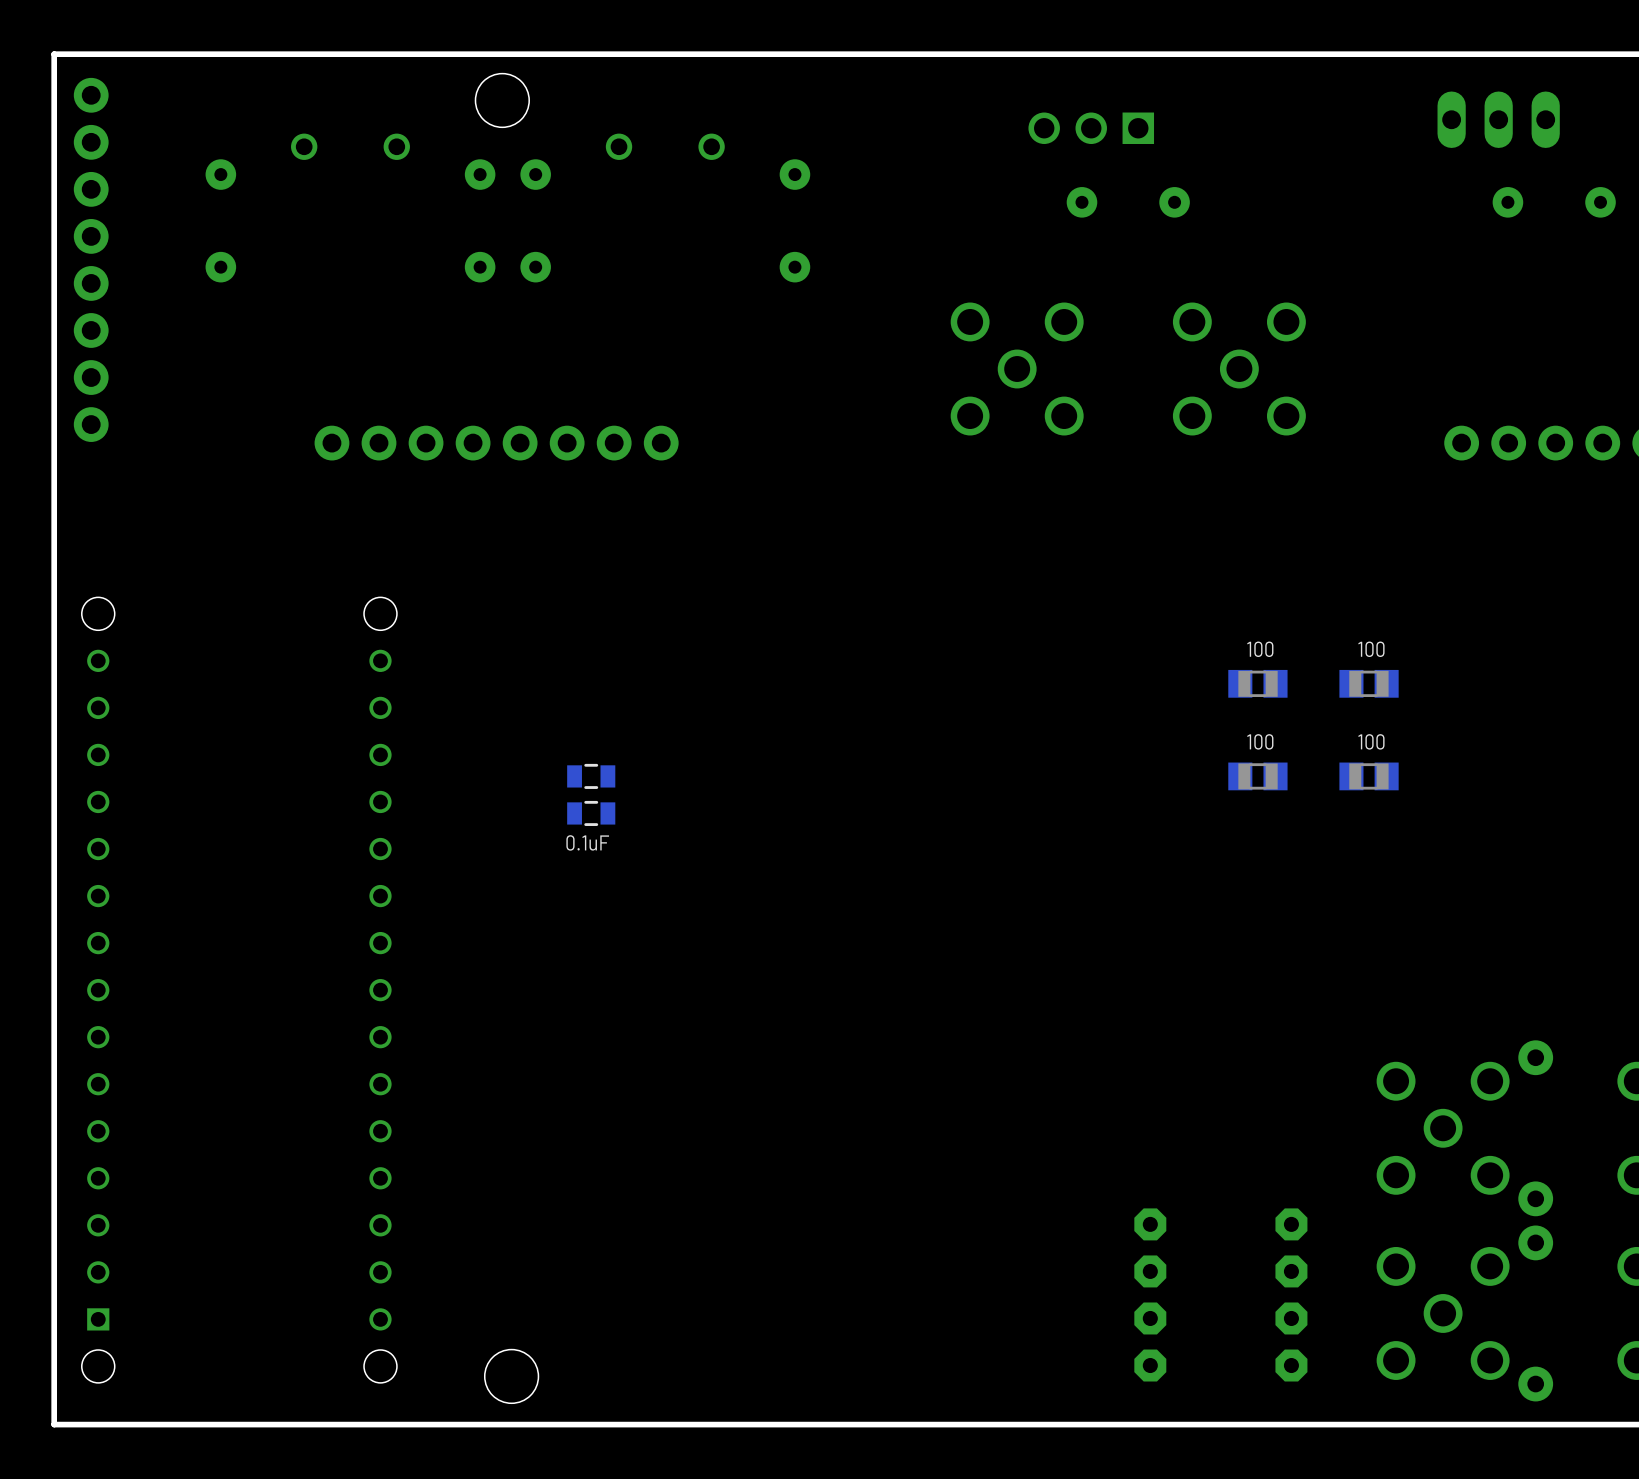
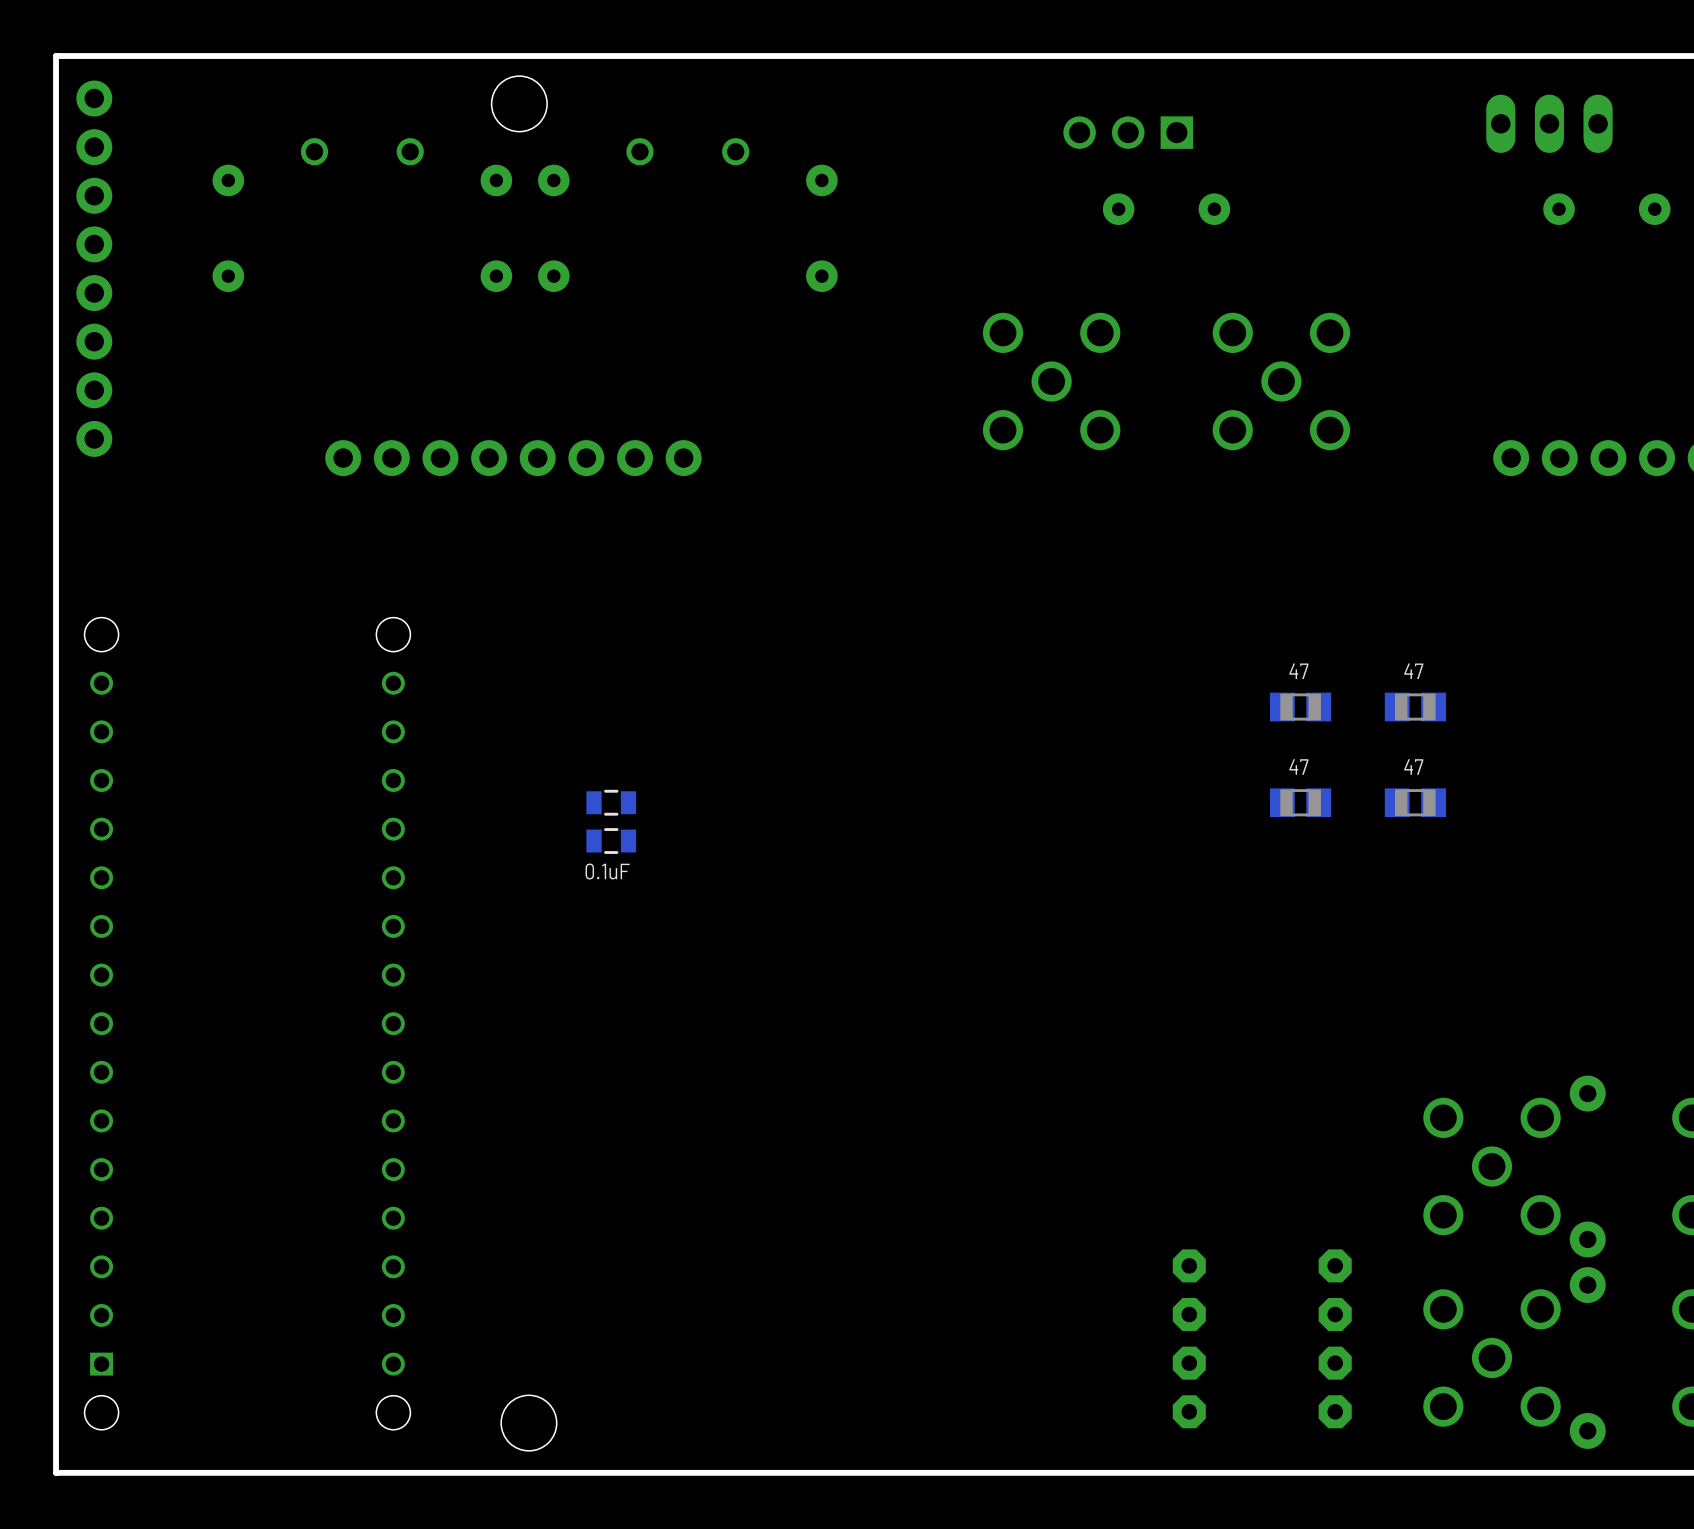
part value: 100 (1260, 649) -> 47 (1298, 671)
part value: 100 (1371, 649) -> 47 (1413, 671)
part value: 100 (1260, 741) -> 47 (1298, 766)
part value: 100 (1371, 741) -> 47 (1413, 766)

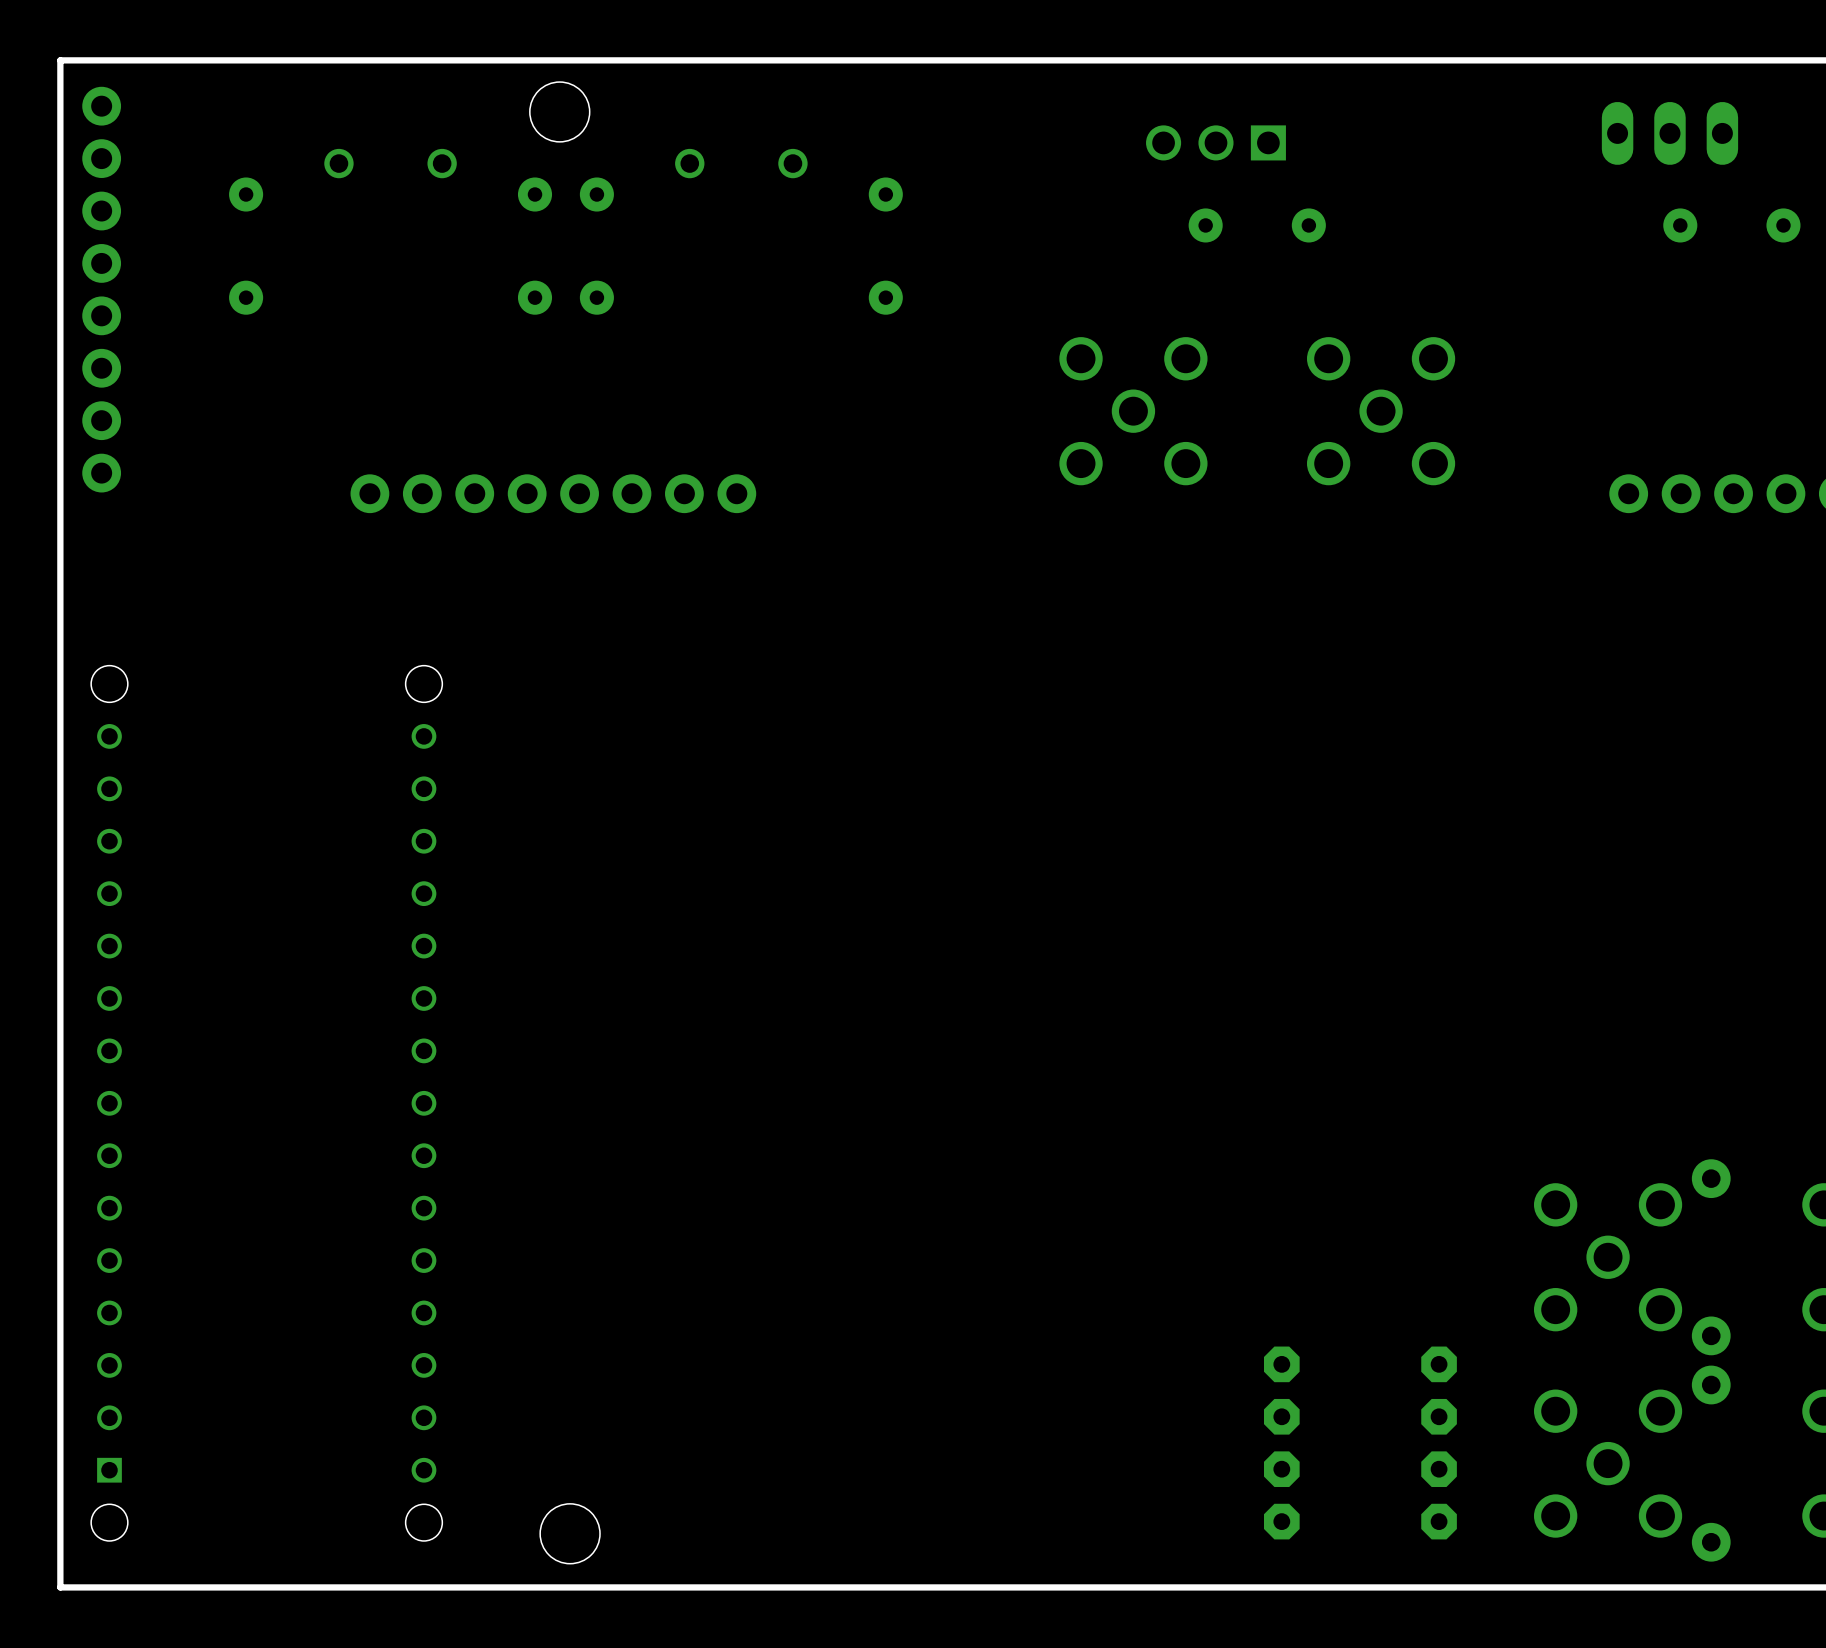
part: 47 (1300, 707) -> none
part: 47 (1415, 707) -> none
part: (611, 802) -> none
part: 47 (1300, 802) -> none
part: 47 (1415, 802) -> none
part: 0.1uF (611, 841) -> none

